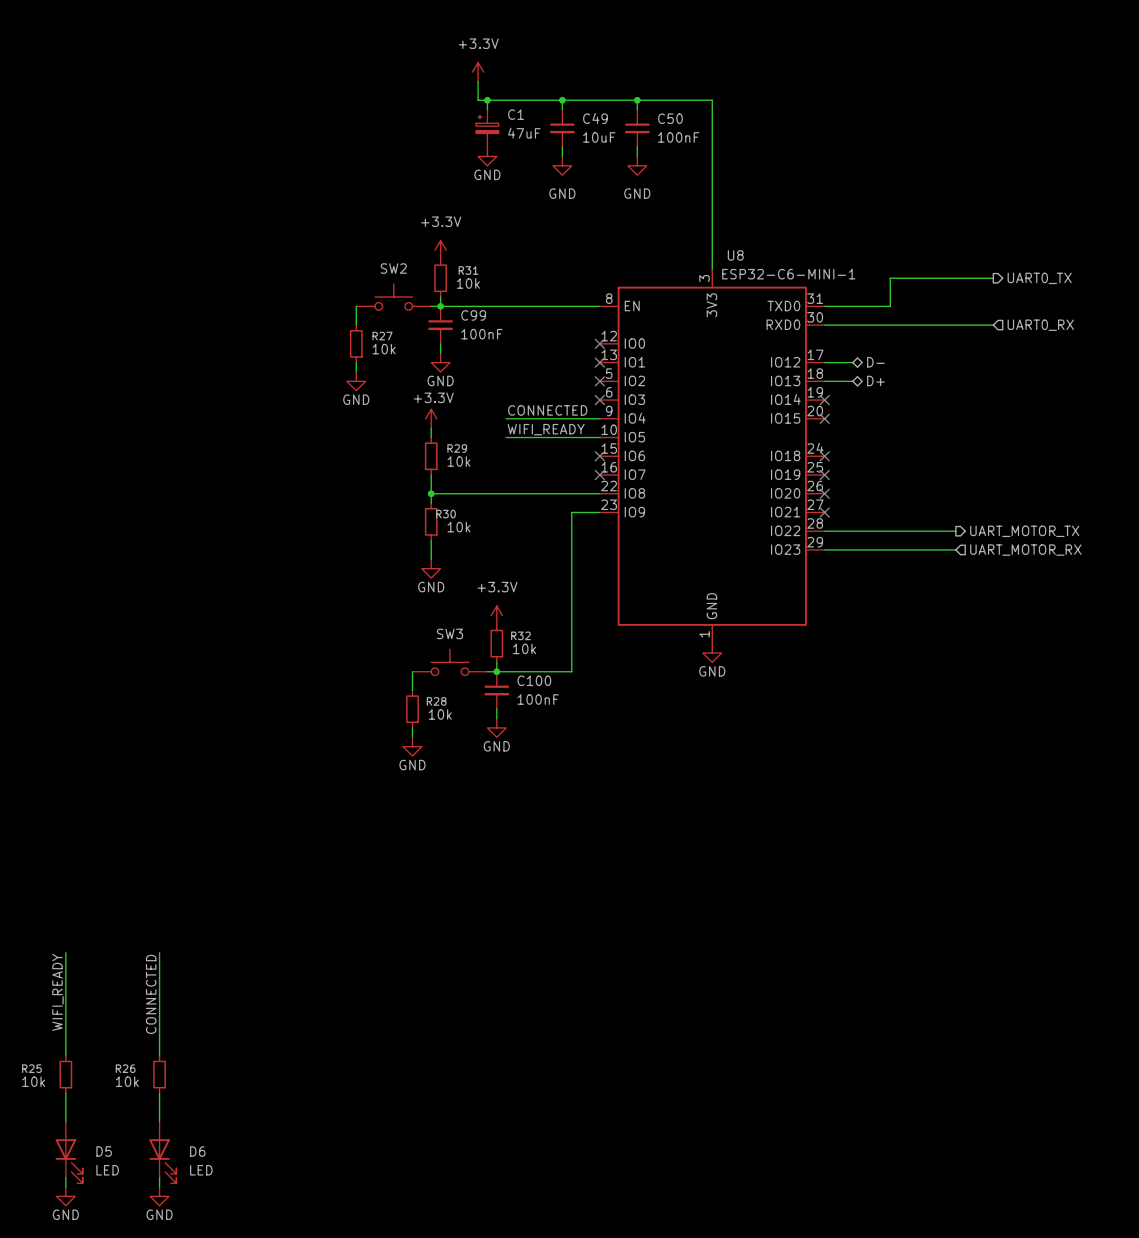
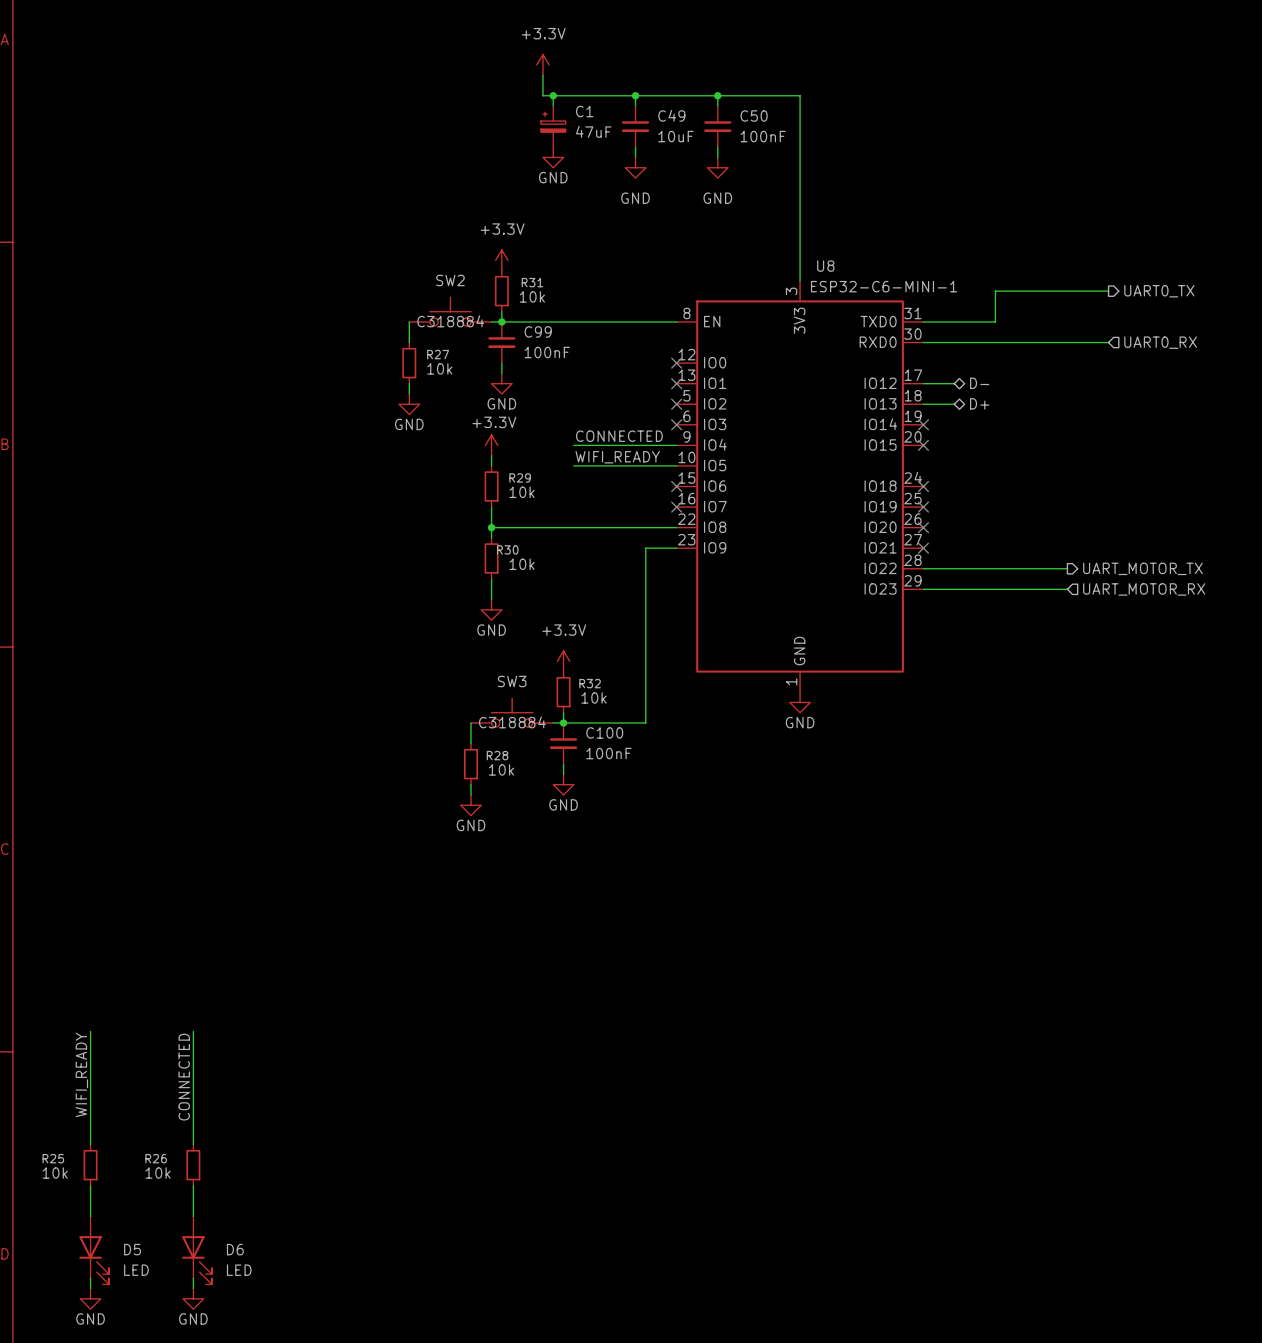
SW2 text: none -> C318884 (450, 321)
SW3 text: none -> C318884 (512, 722)

